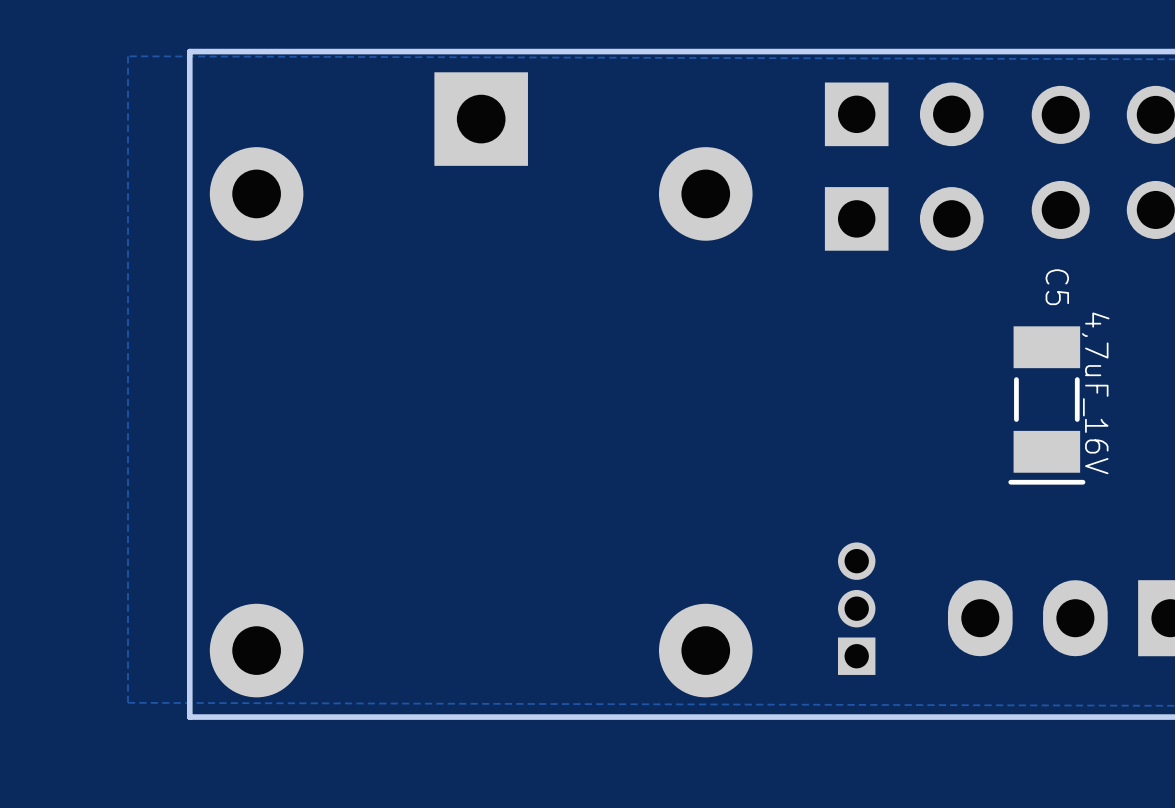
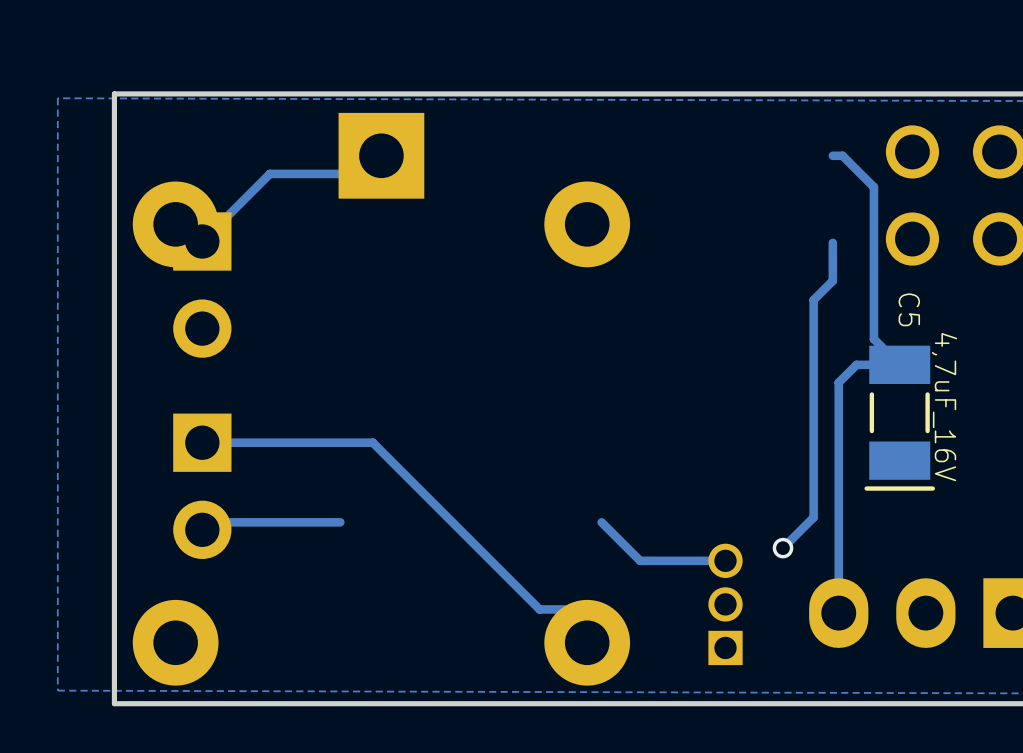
part: (904, 114) -> none
track: none -> (832, 155) (842, 155) (873, 187) (873, 339) (899, 364) (856, 364) (838, 382) (838, 613)
track: none -> (340, 173) (269, 173) (202, 241)
track: none -> (832, 242) (832, 280) (813, 300) (813, 517) (783, 548)
part: (904, 218) -> none
part: none -> (202, 285)
track: none -> (202, 442) (372, 442) (539, 609) (601, 609)
part: none -> (202, 486)
track: none -> (340, 522) (209, 522) (202, 529)
track: none -> (601, 522) (640, 560) (725, 560)
via: none -> (783, 548)

